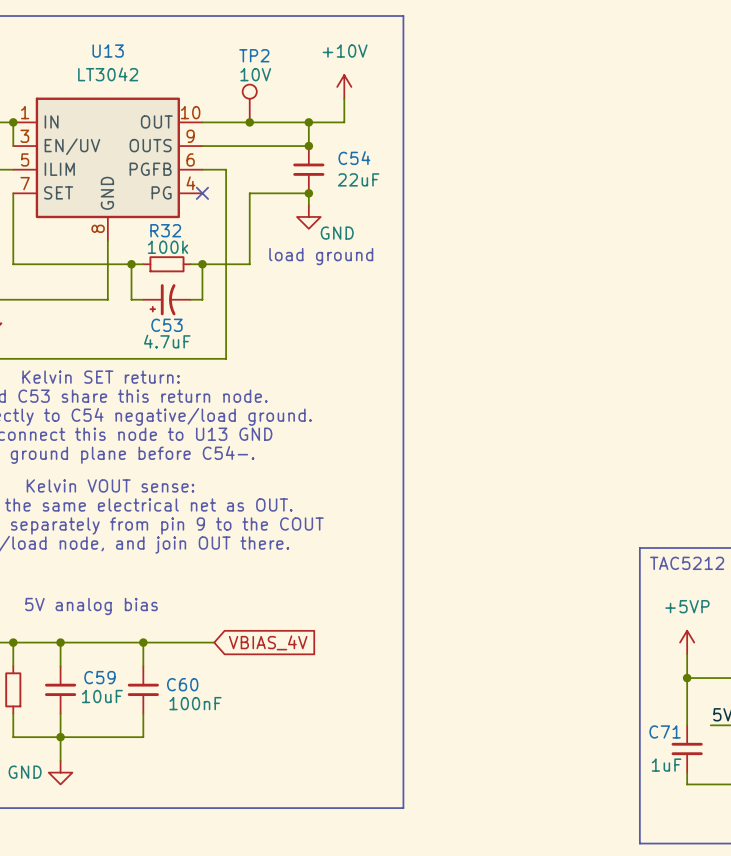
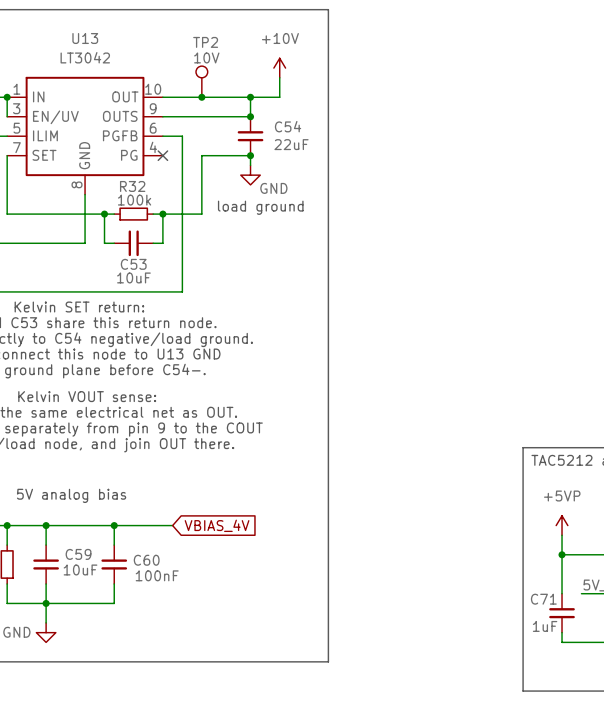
C53 symbol: [143, 284, 191, 316] -> [114, 230, 154, 257]
C53 value: 4.7uF (167, 341) -> 10uF (133, 277)

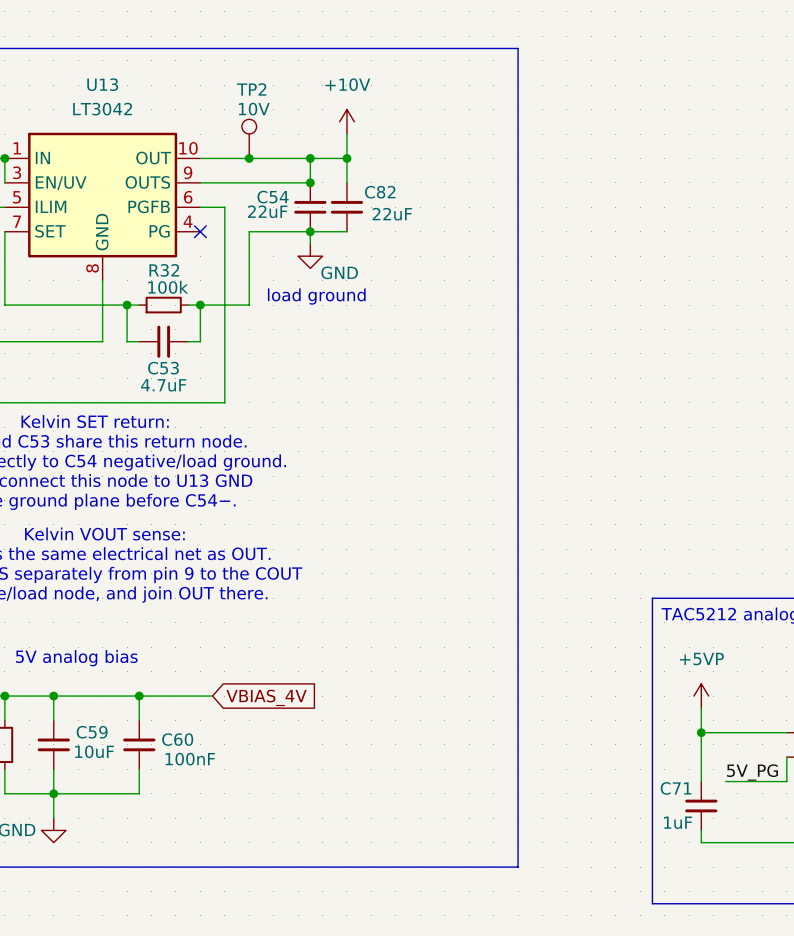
line: (328, 9) (328, 661) -> (408, 48) (518, 48) (518, 867) (408, 867)
wire: none -> (346, 158) (346, 182)
junction: none -> (346, 158)
C54 name position: C54 (288, 126) -> C54 (273, 197)
C82: none -> 22uF (346, 207)
C54 value position: 22uF (291, 144) -> 22uF (267, 211)
wire: none -> (310, 231) (346, 231)
C53 value: 10uF (133, 277) -> 4.7uF (163, 385)

